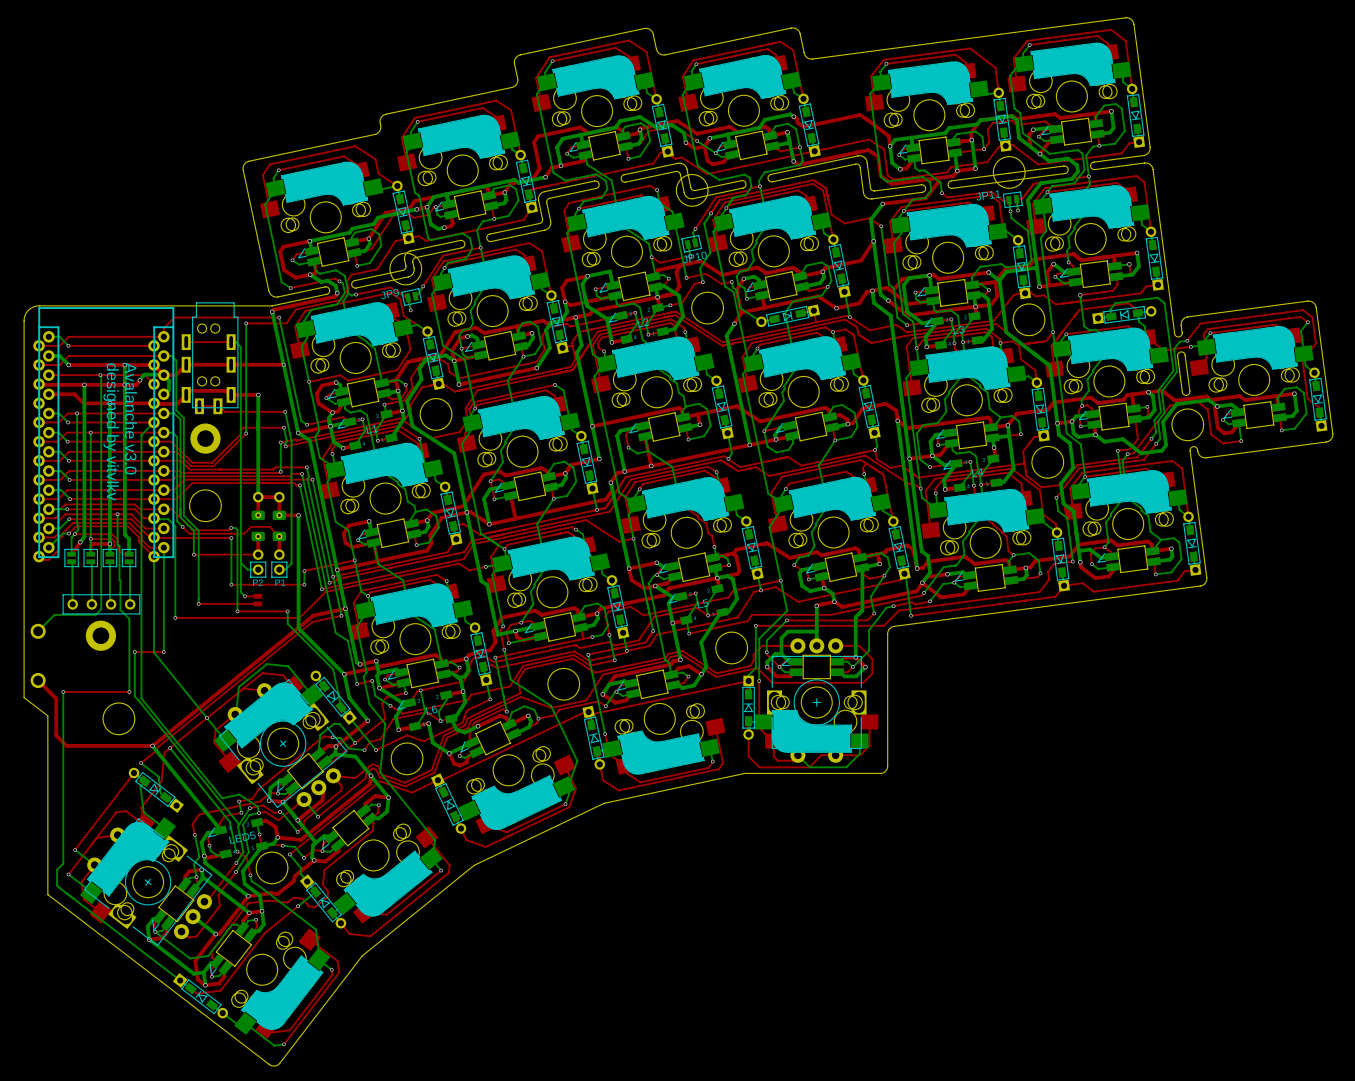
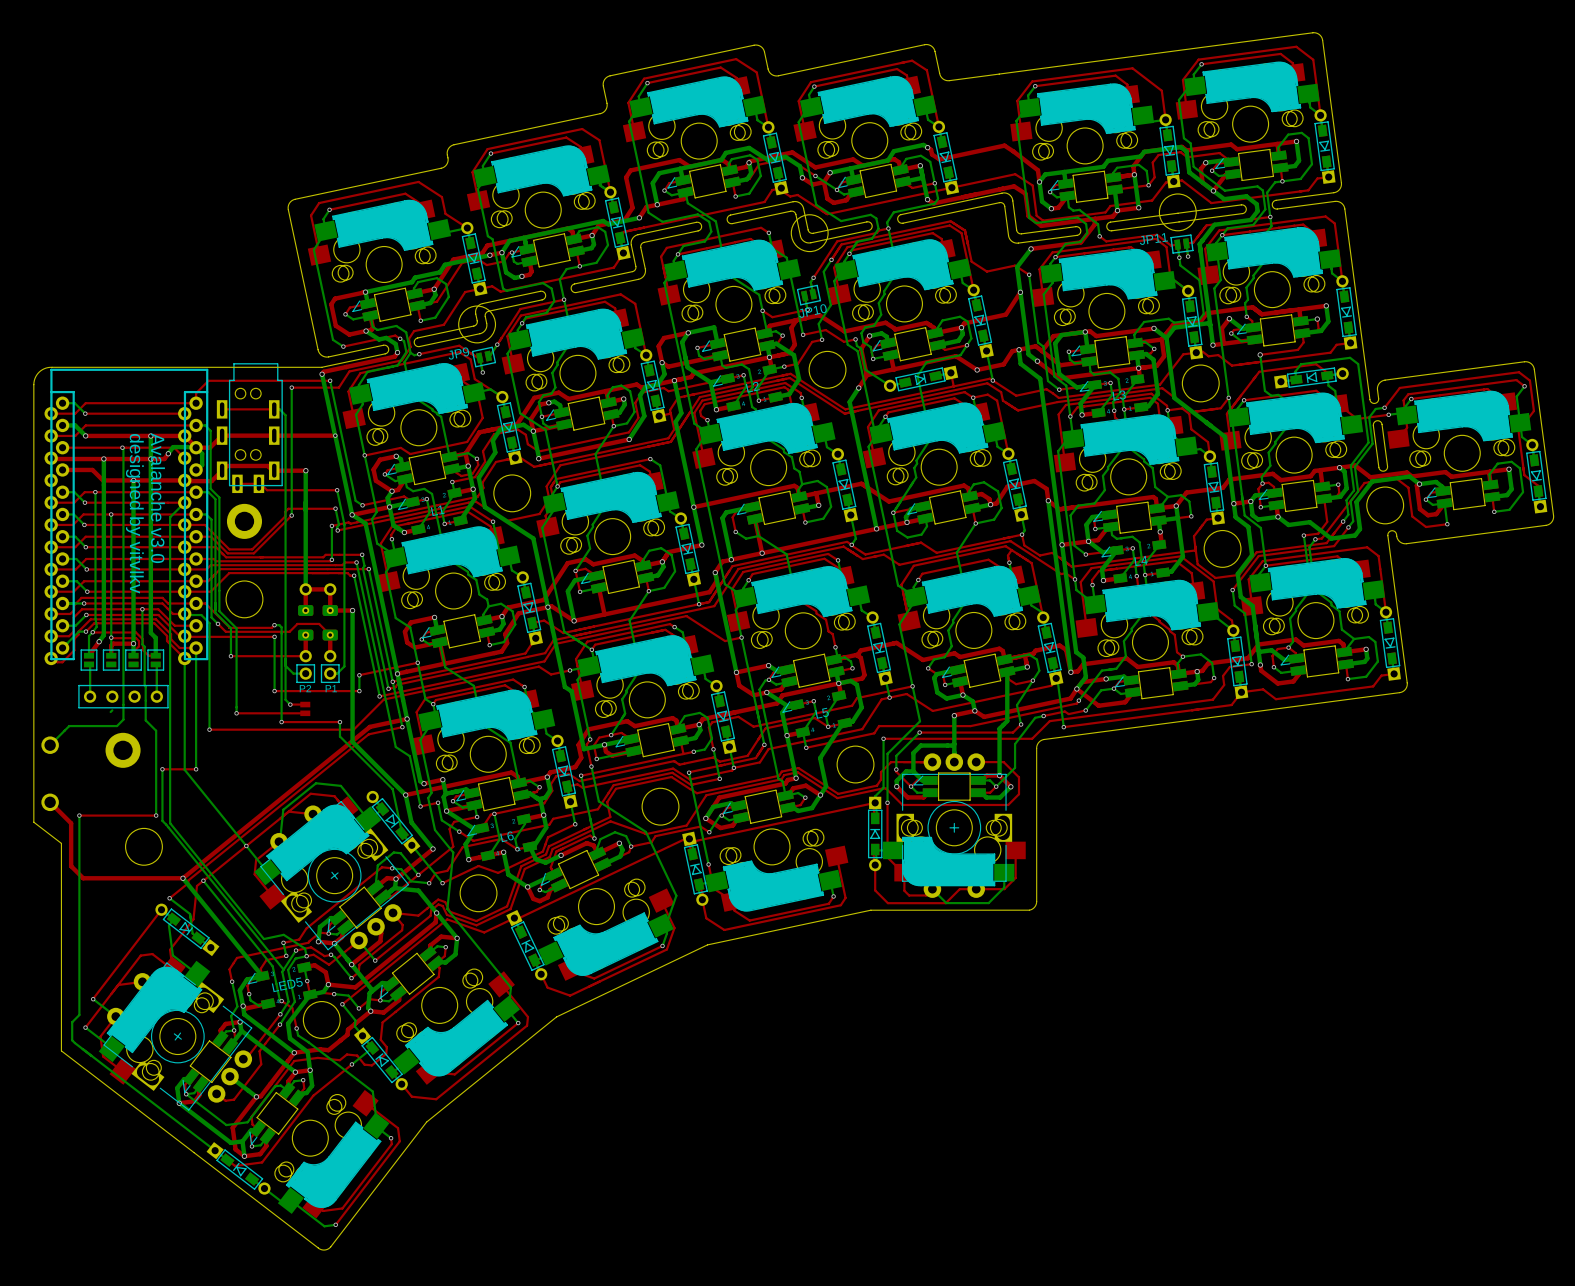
bottom track: (90, 561) (91, 604) -> none
bottom track: (109, 561) (111, 604) -> none
bottom track: (72, 589) (72, 604) -> none
bottom track: (130, 589) (130, 604) -> none
part position: (101, 604) -> (123, 696)

